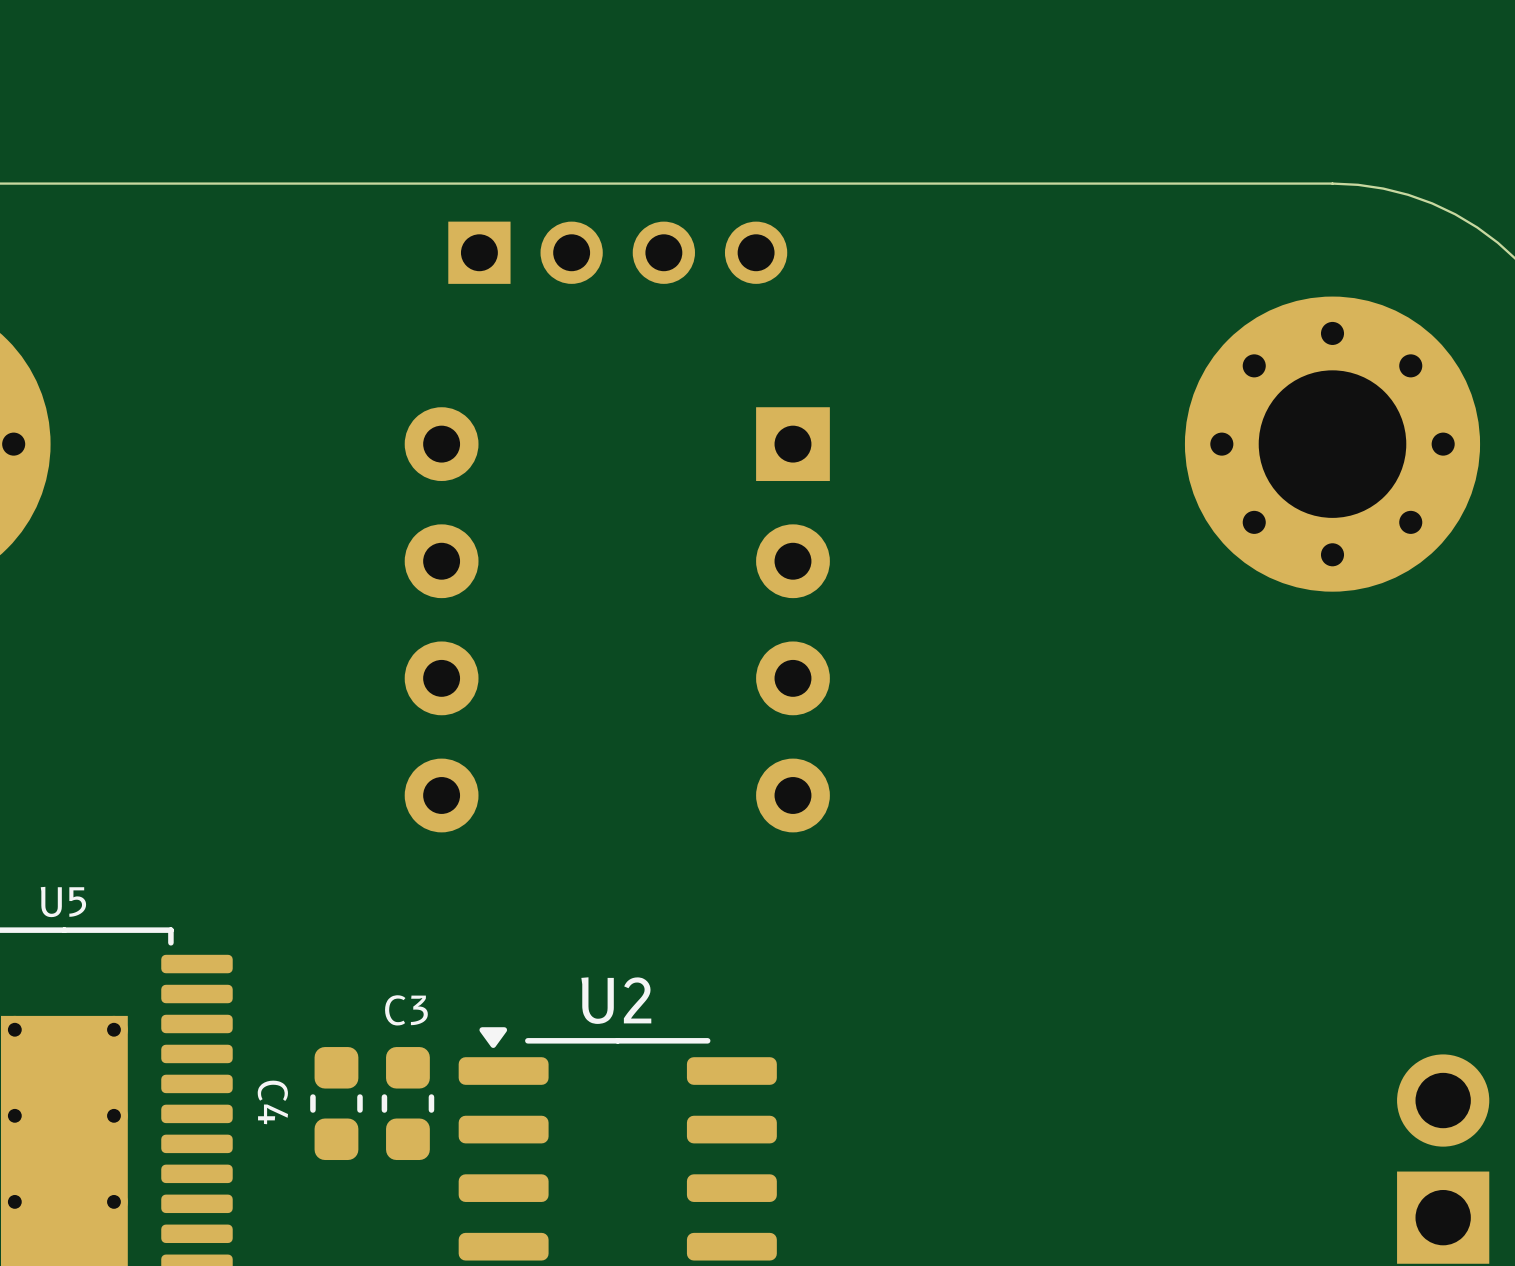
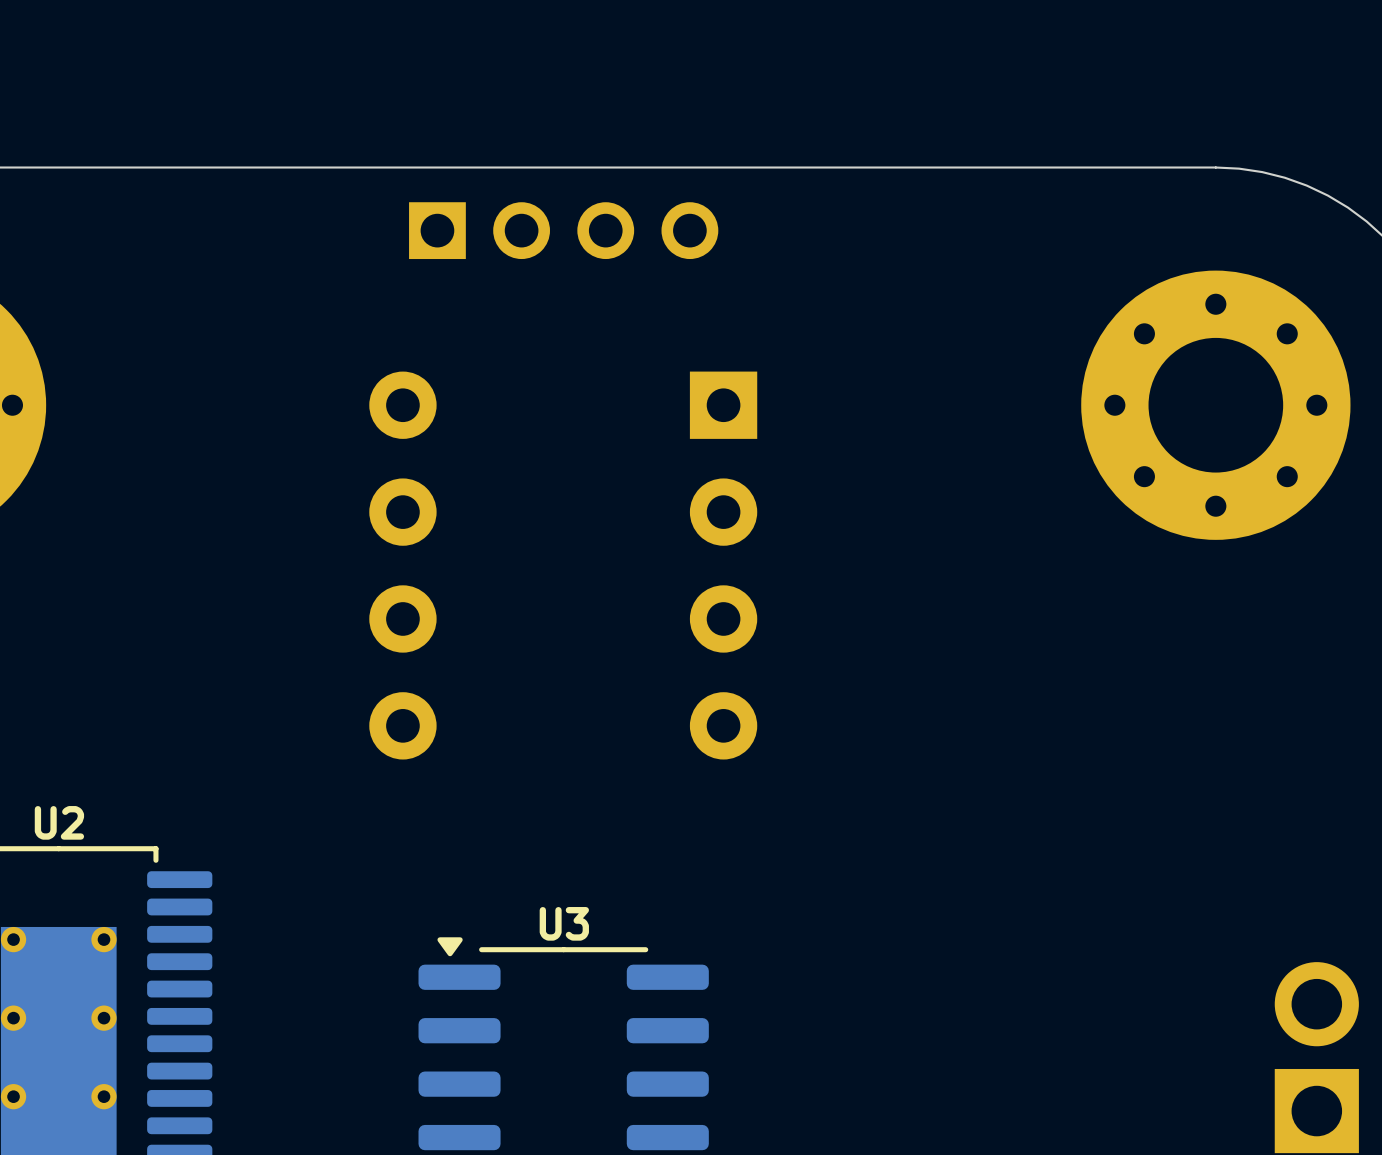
U5 name: U5 (63, 901) -> U2 (59, 822)
U2 name: U2 (616, 1000) -> U3 (564, 923)
C4: (336, 1103) -> none
C3: (407, 1103) -> none

